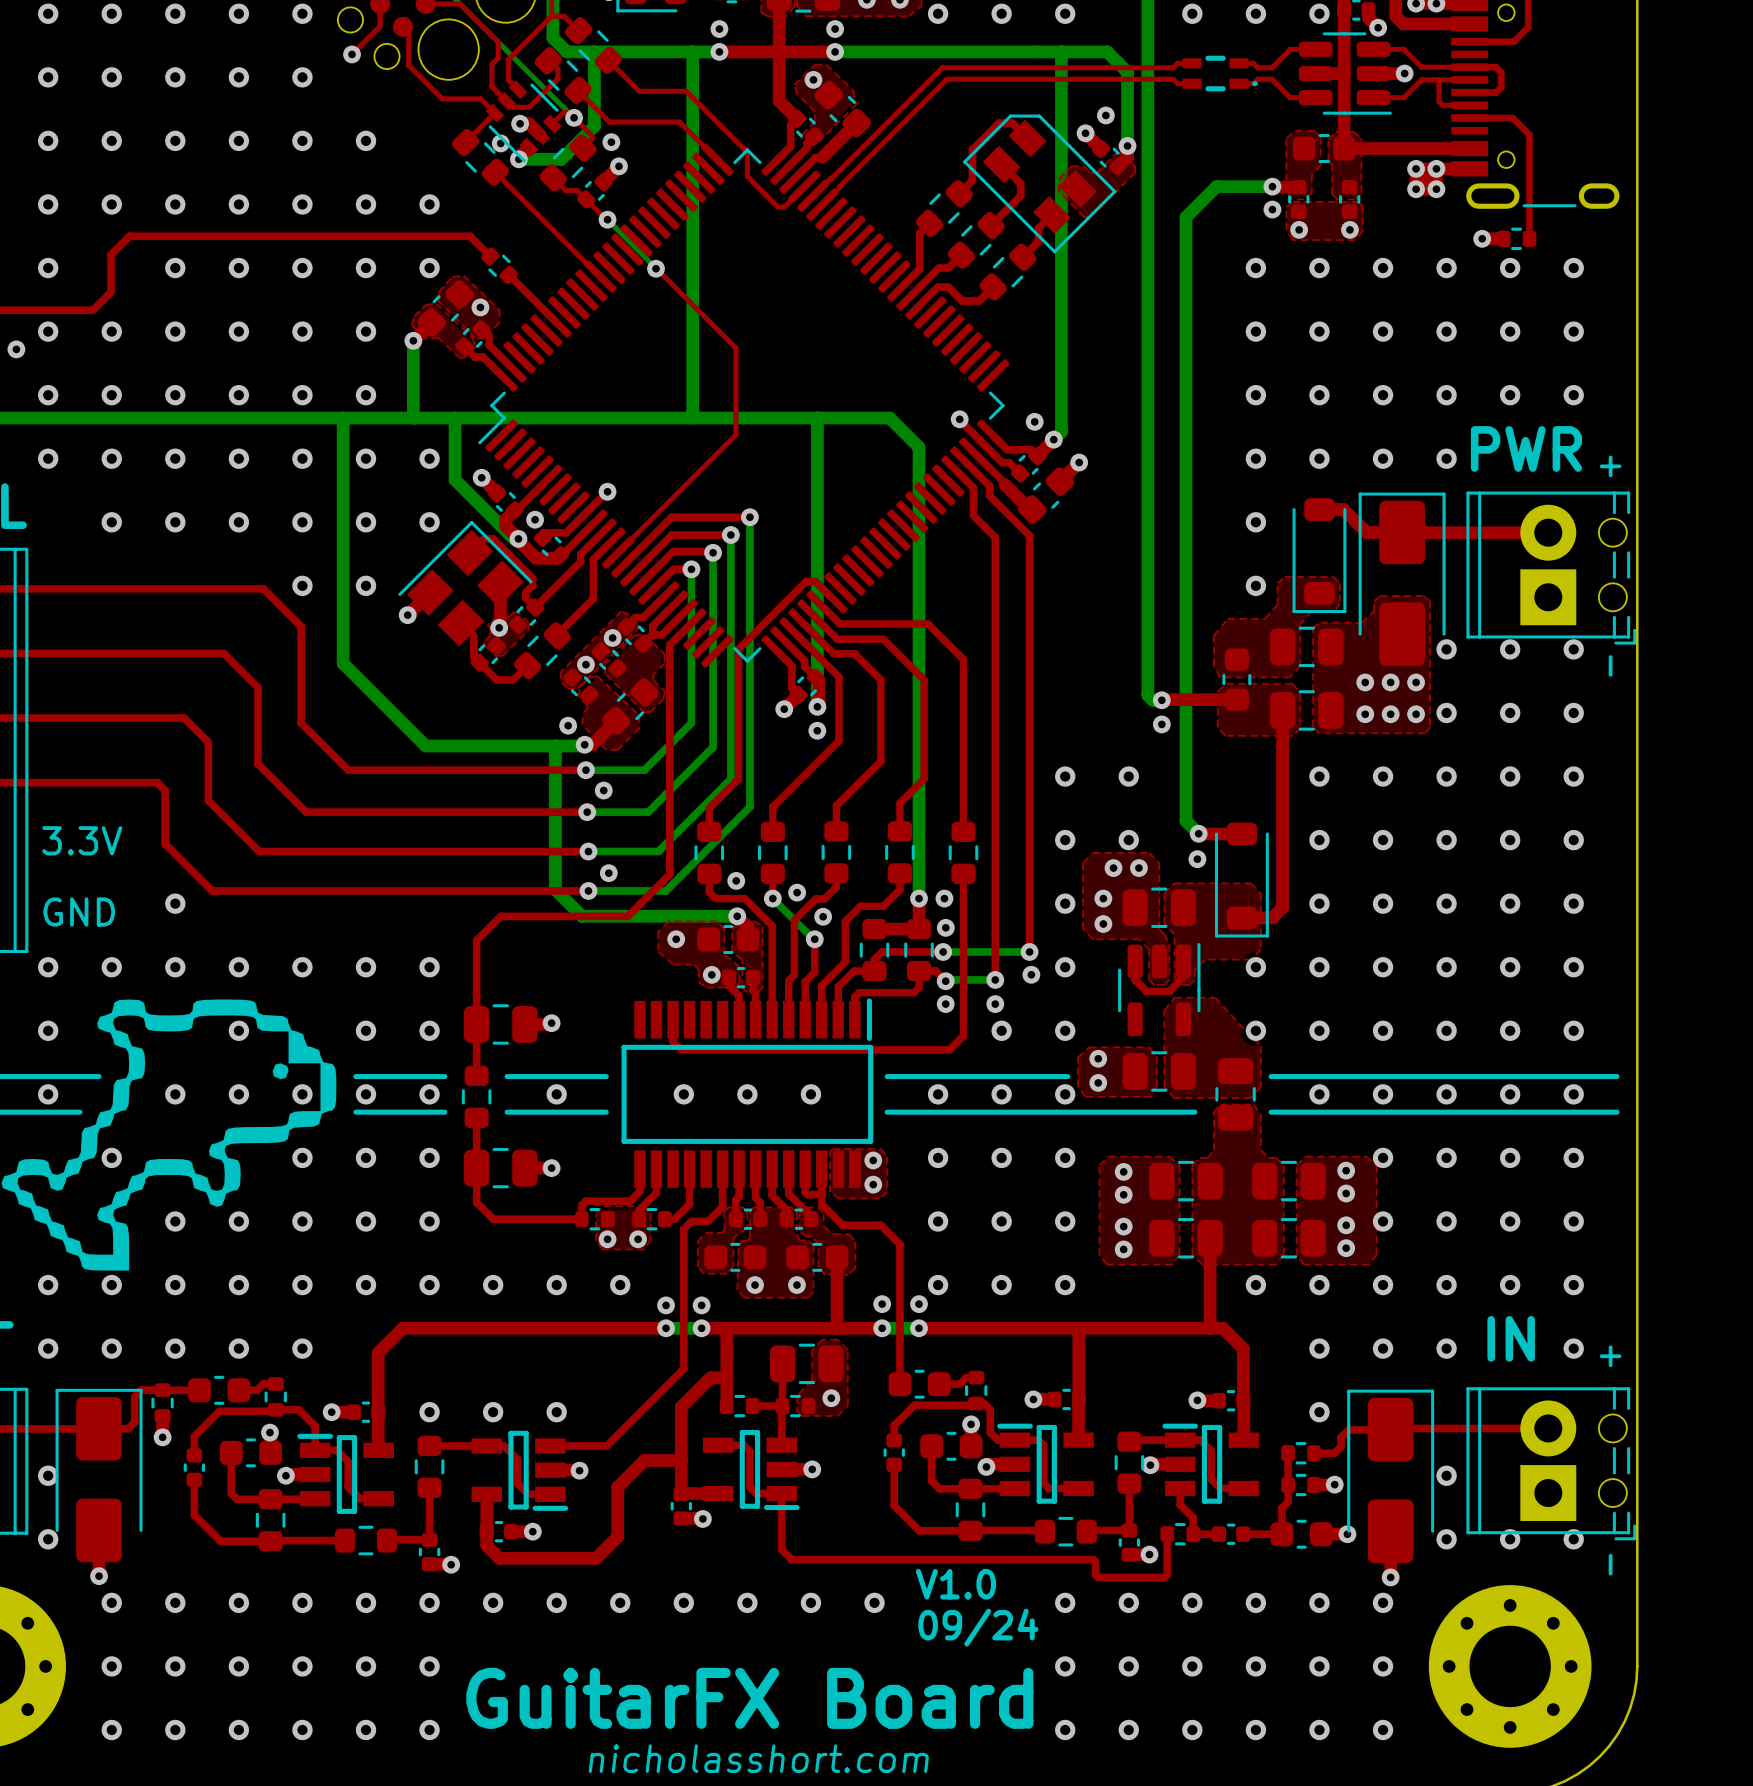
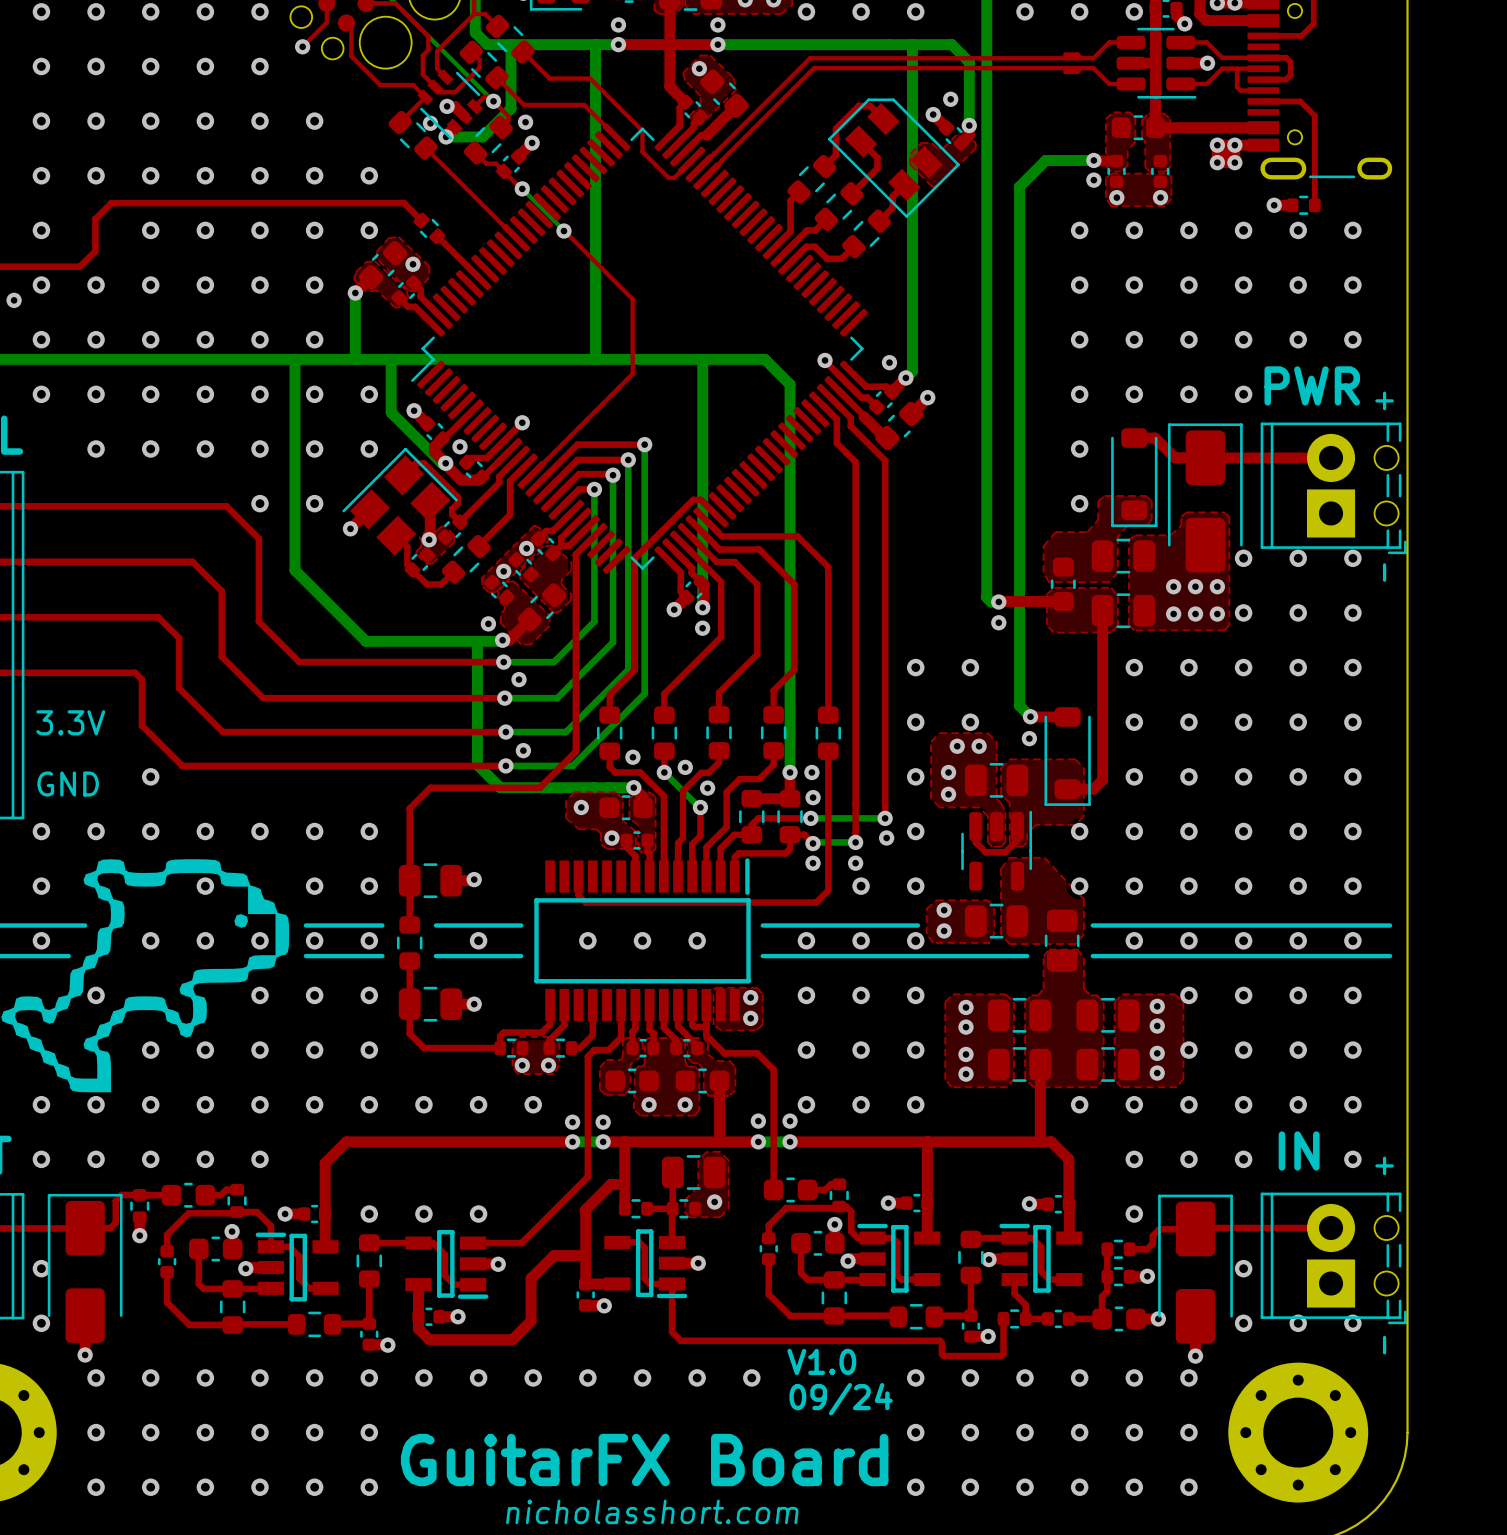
top track: (1192, 63) (1177, 63) (1173, 67) -> (1081, 58) (1008, 58)
part: (1219, 73) -> none
top track: (1173, 79) (1177, 83) (1192, 83) -> (1008, 68) (1081, 68)

